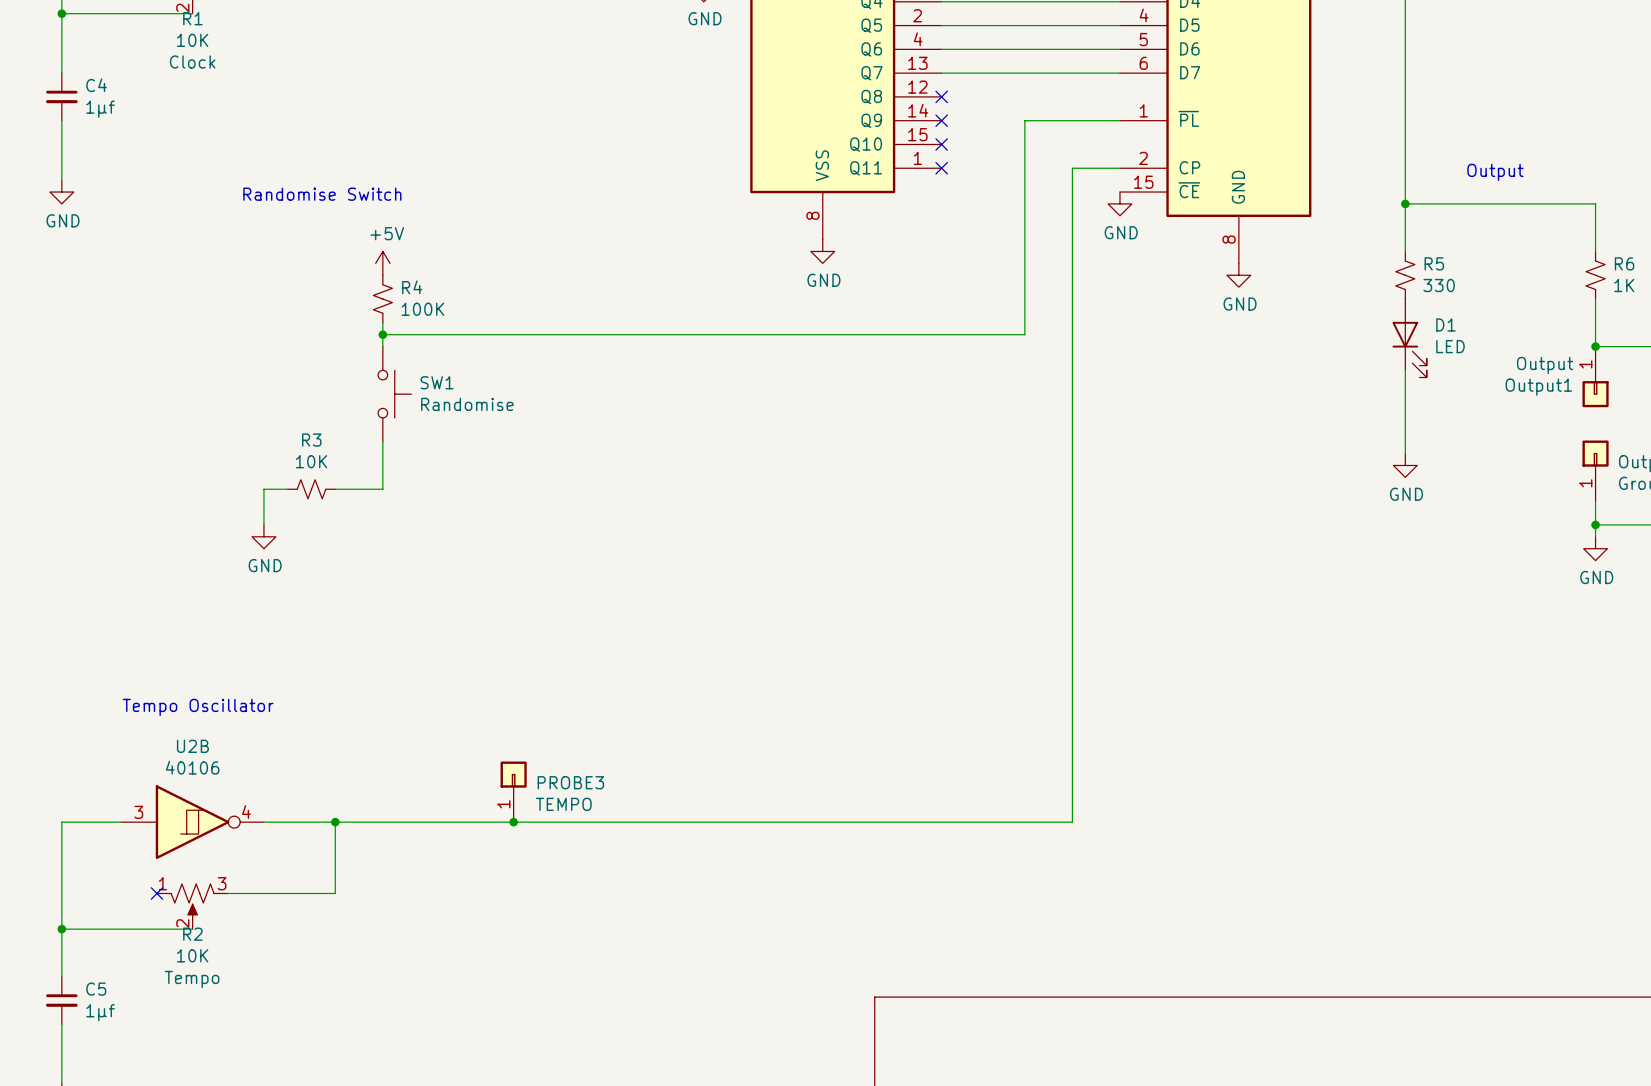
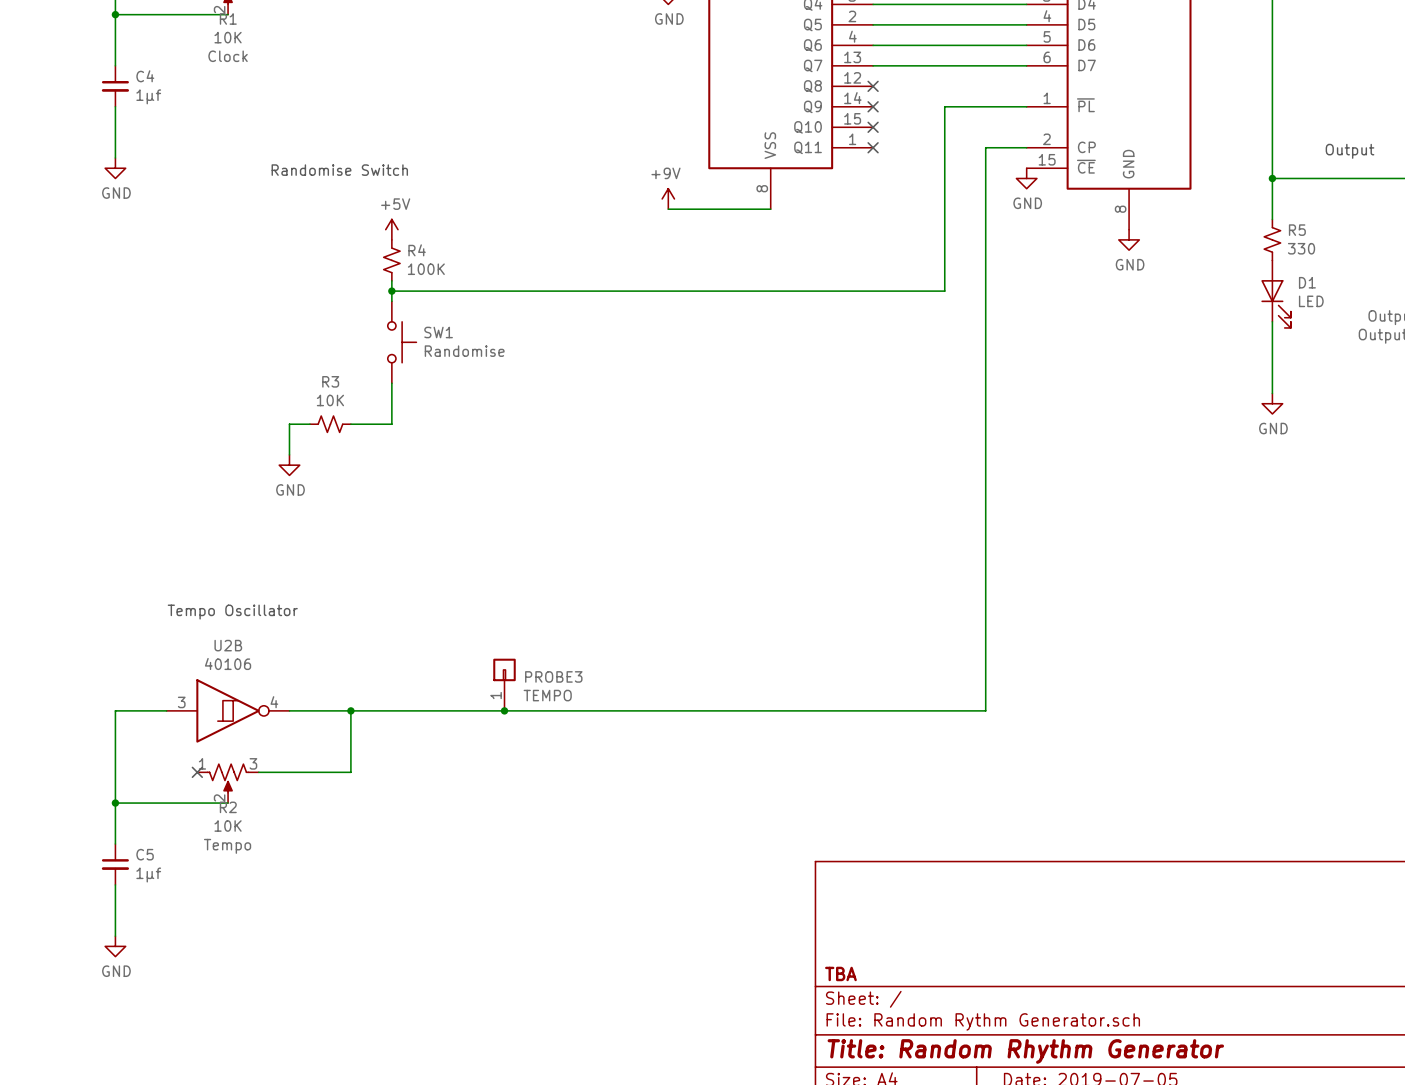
power symbol: none -> +9V (668, 198)
wire: none -> (668, 209) (770, 209)
power symbol: GND (822, 251) -> none

